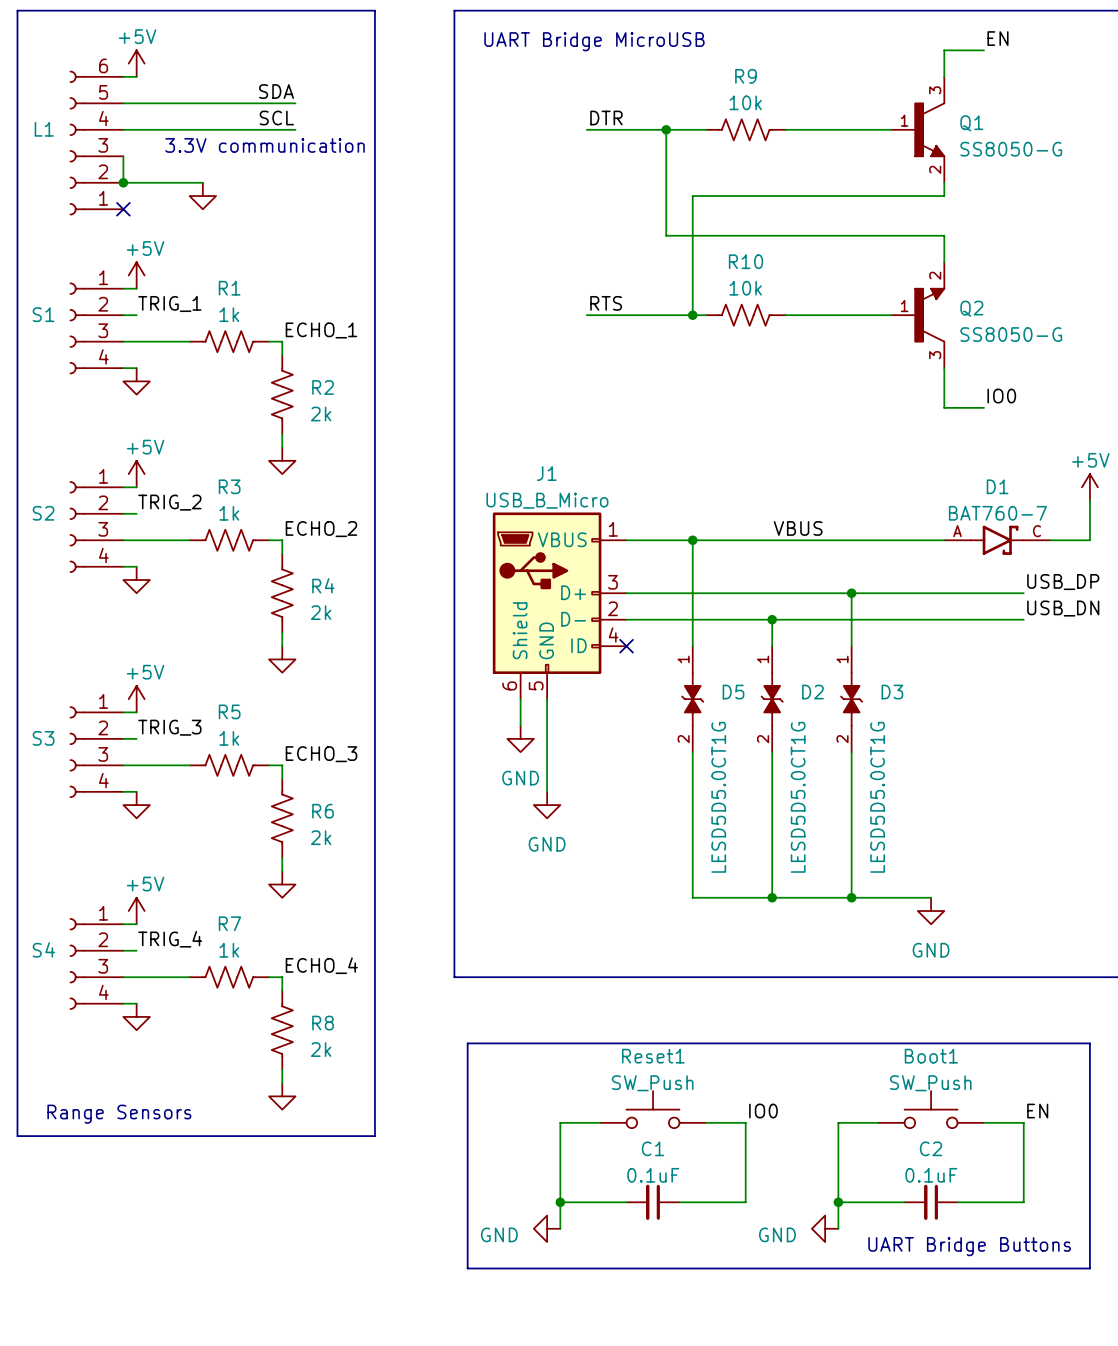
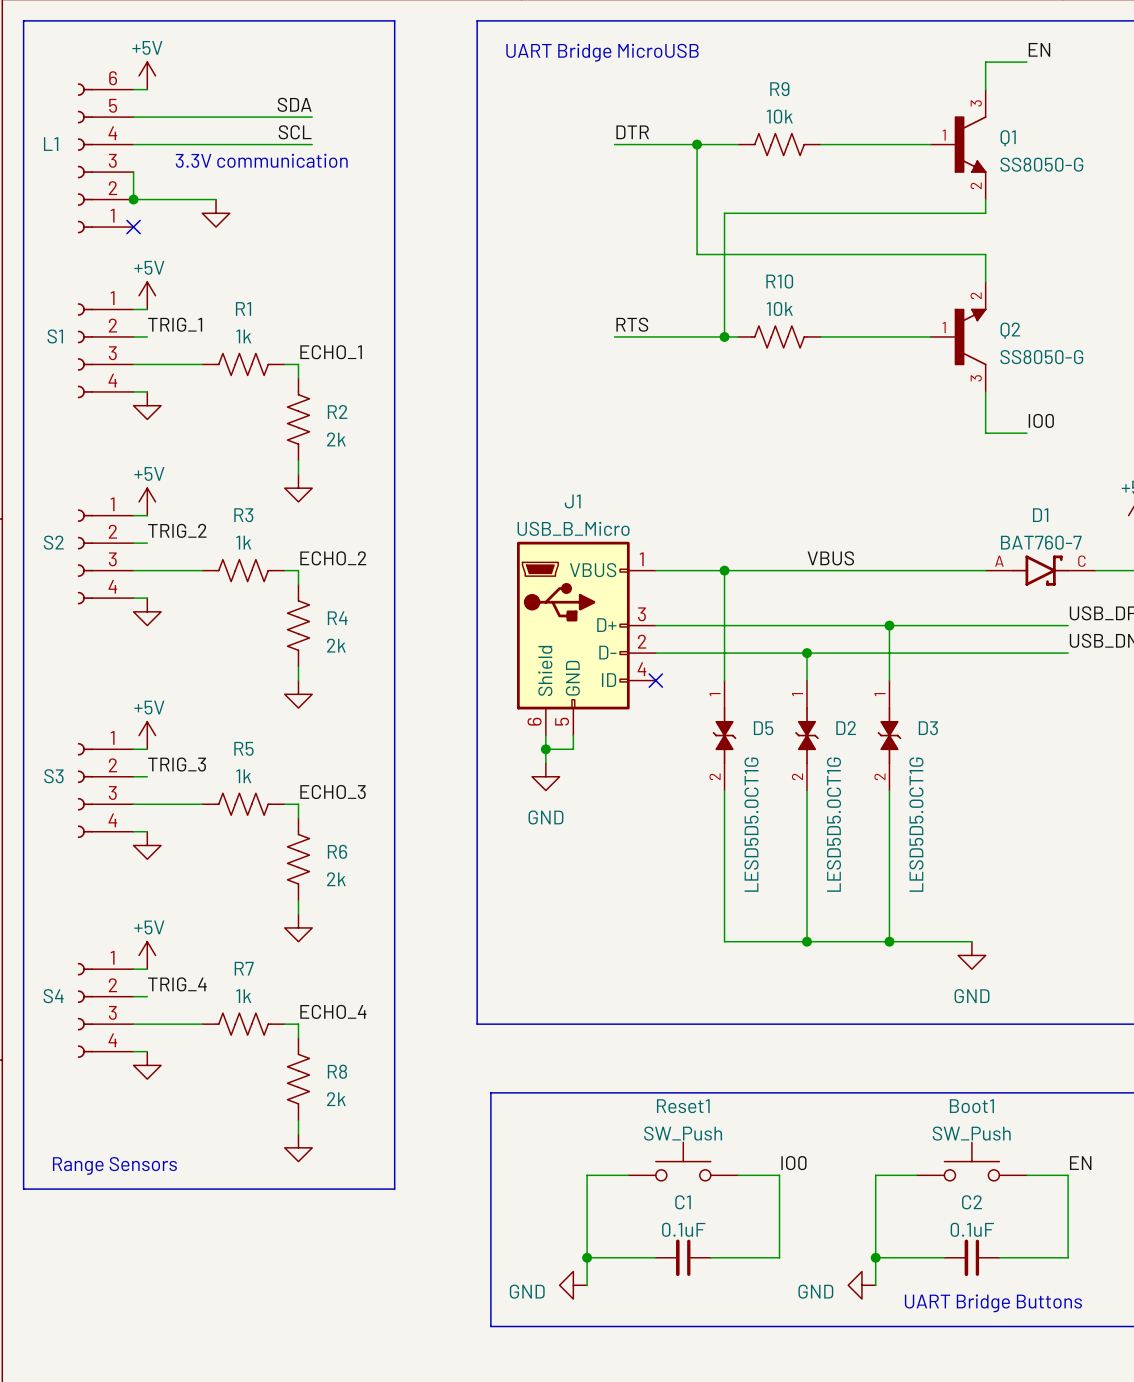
junction: none -> (545, 749)
wire: (547, 712) (547, 791) -> (573, 749) (545, 749)
power symbol: GND (547, 805) -> none

